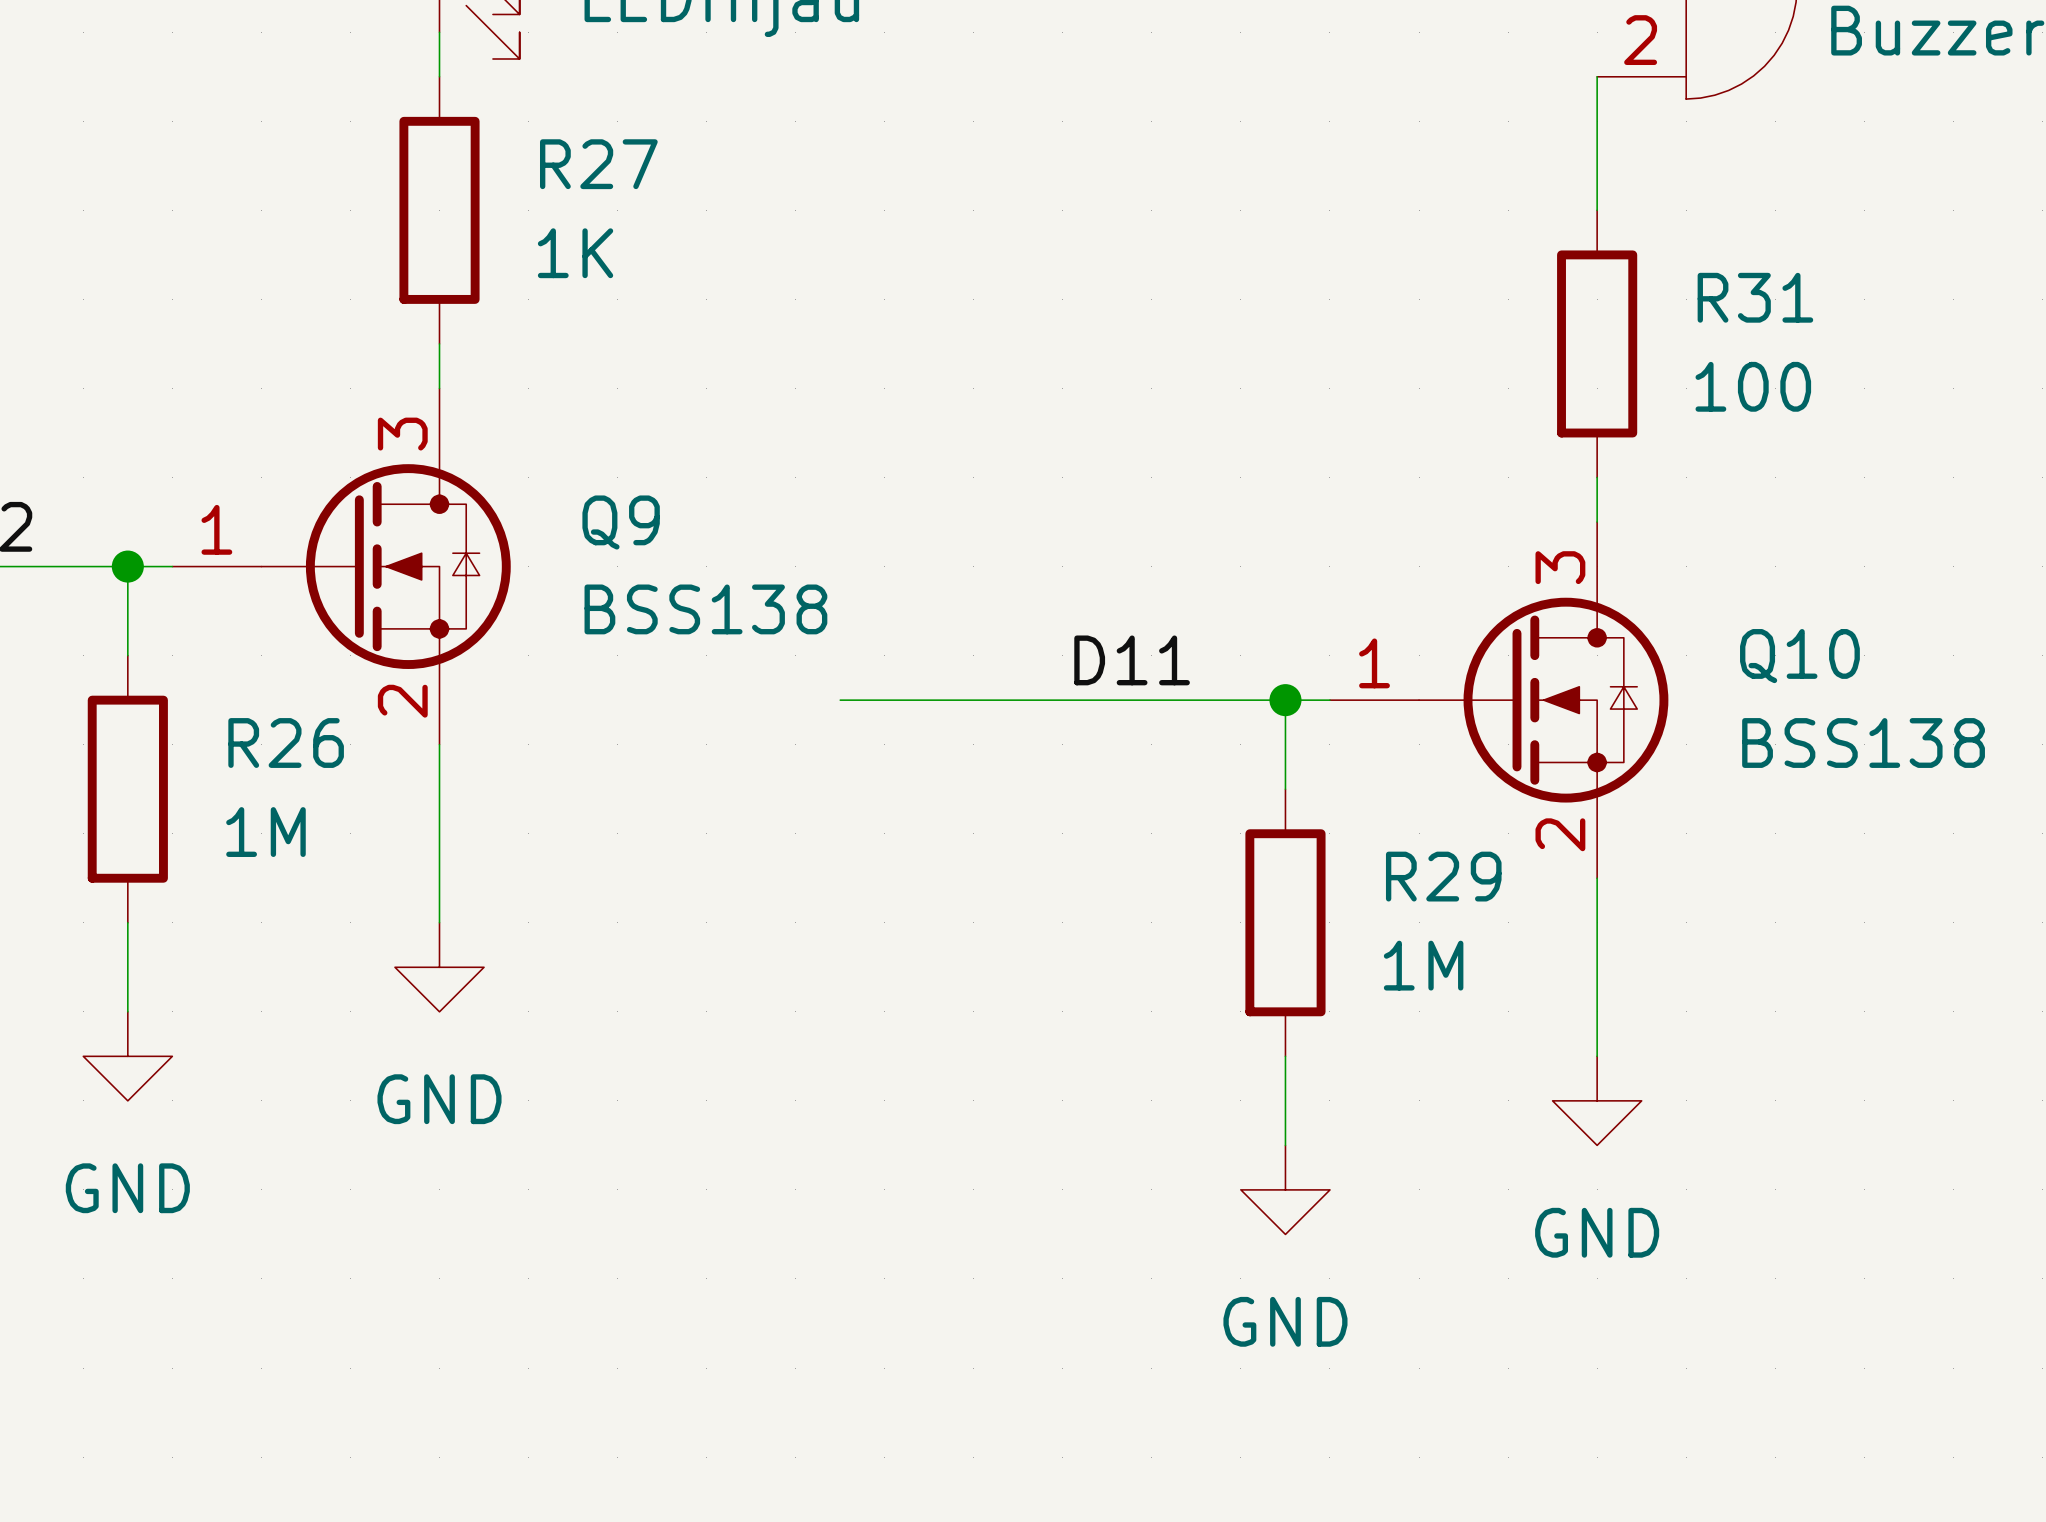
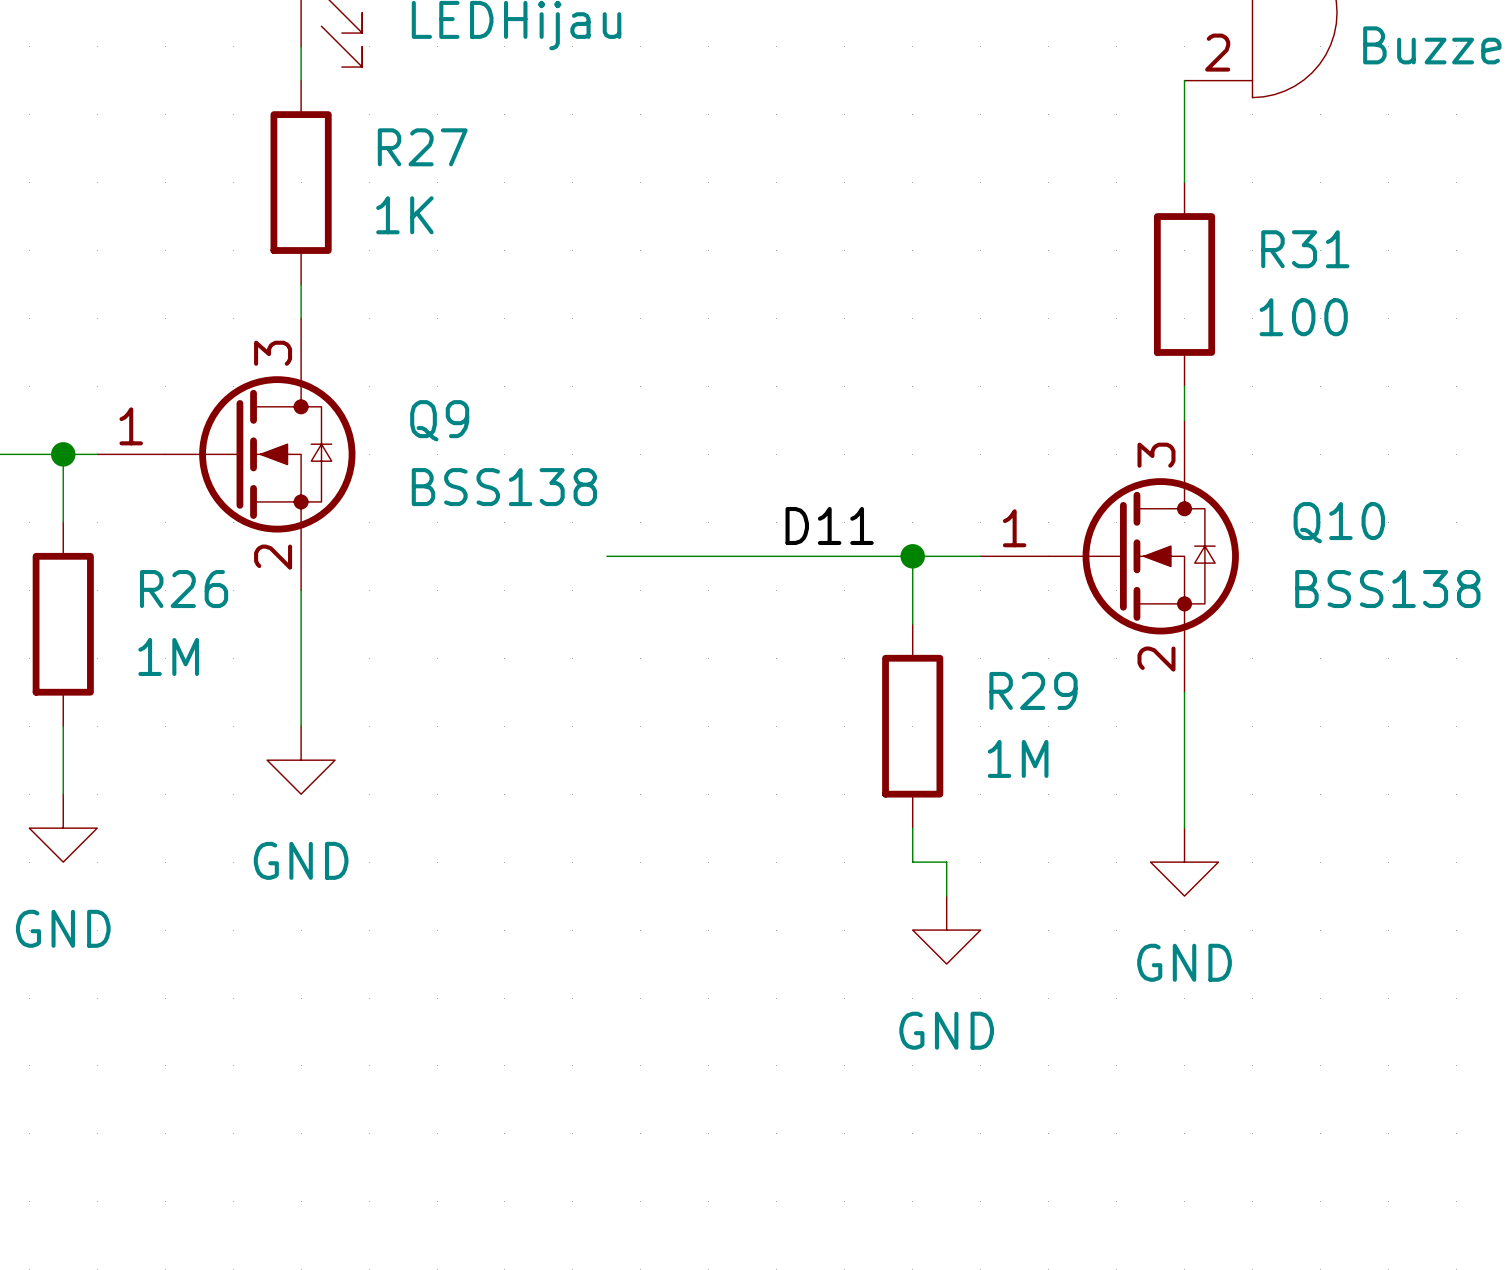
wire: (1285, 700) (1285, 789) -> (912, 556) (912, 624)
junction position: (1285, 700) -> (912, 556)
R29 position: (1285, 922) -> (912, 726)
wire: (1285, 1056) (1285, 1100) -> (912, 828) (912, 862) (946, 862)

